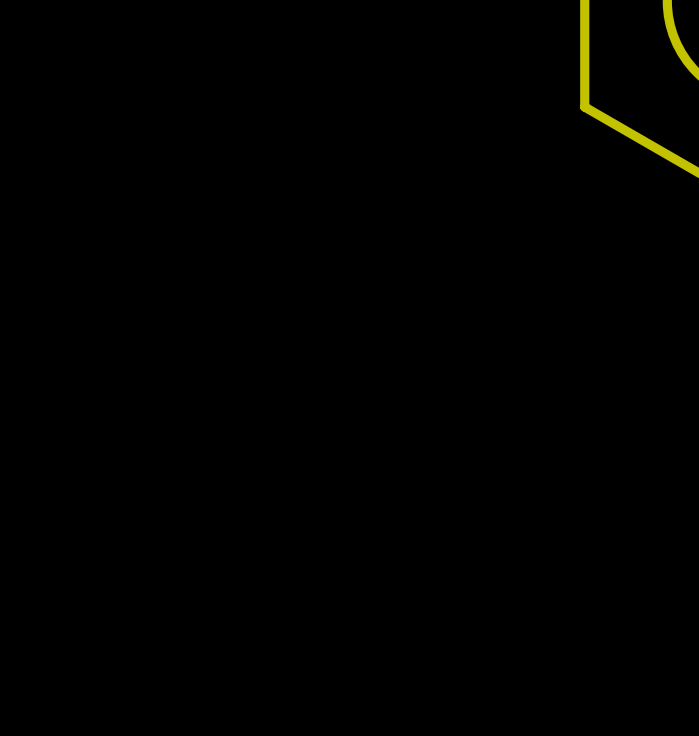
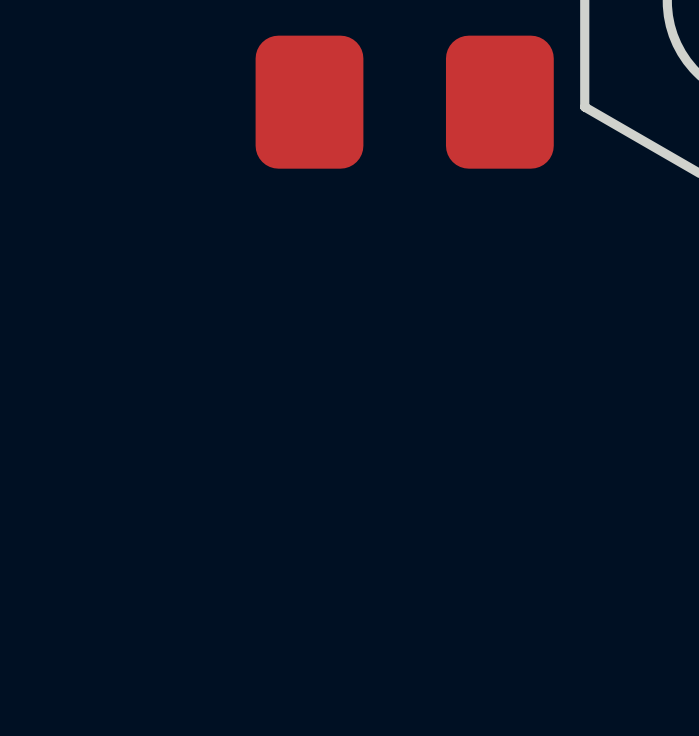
part: none -> (404, 102)

